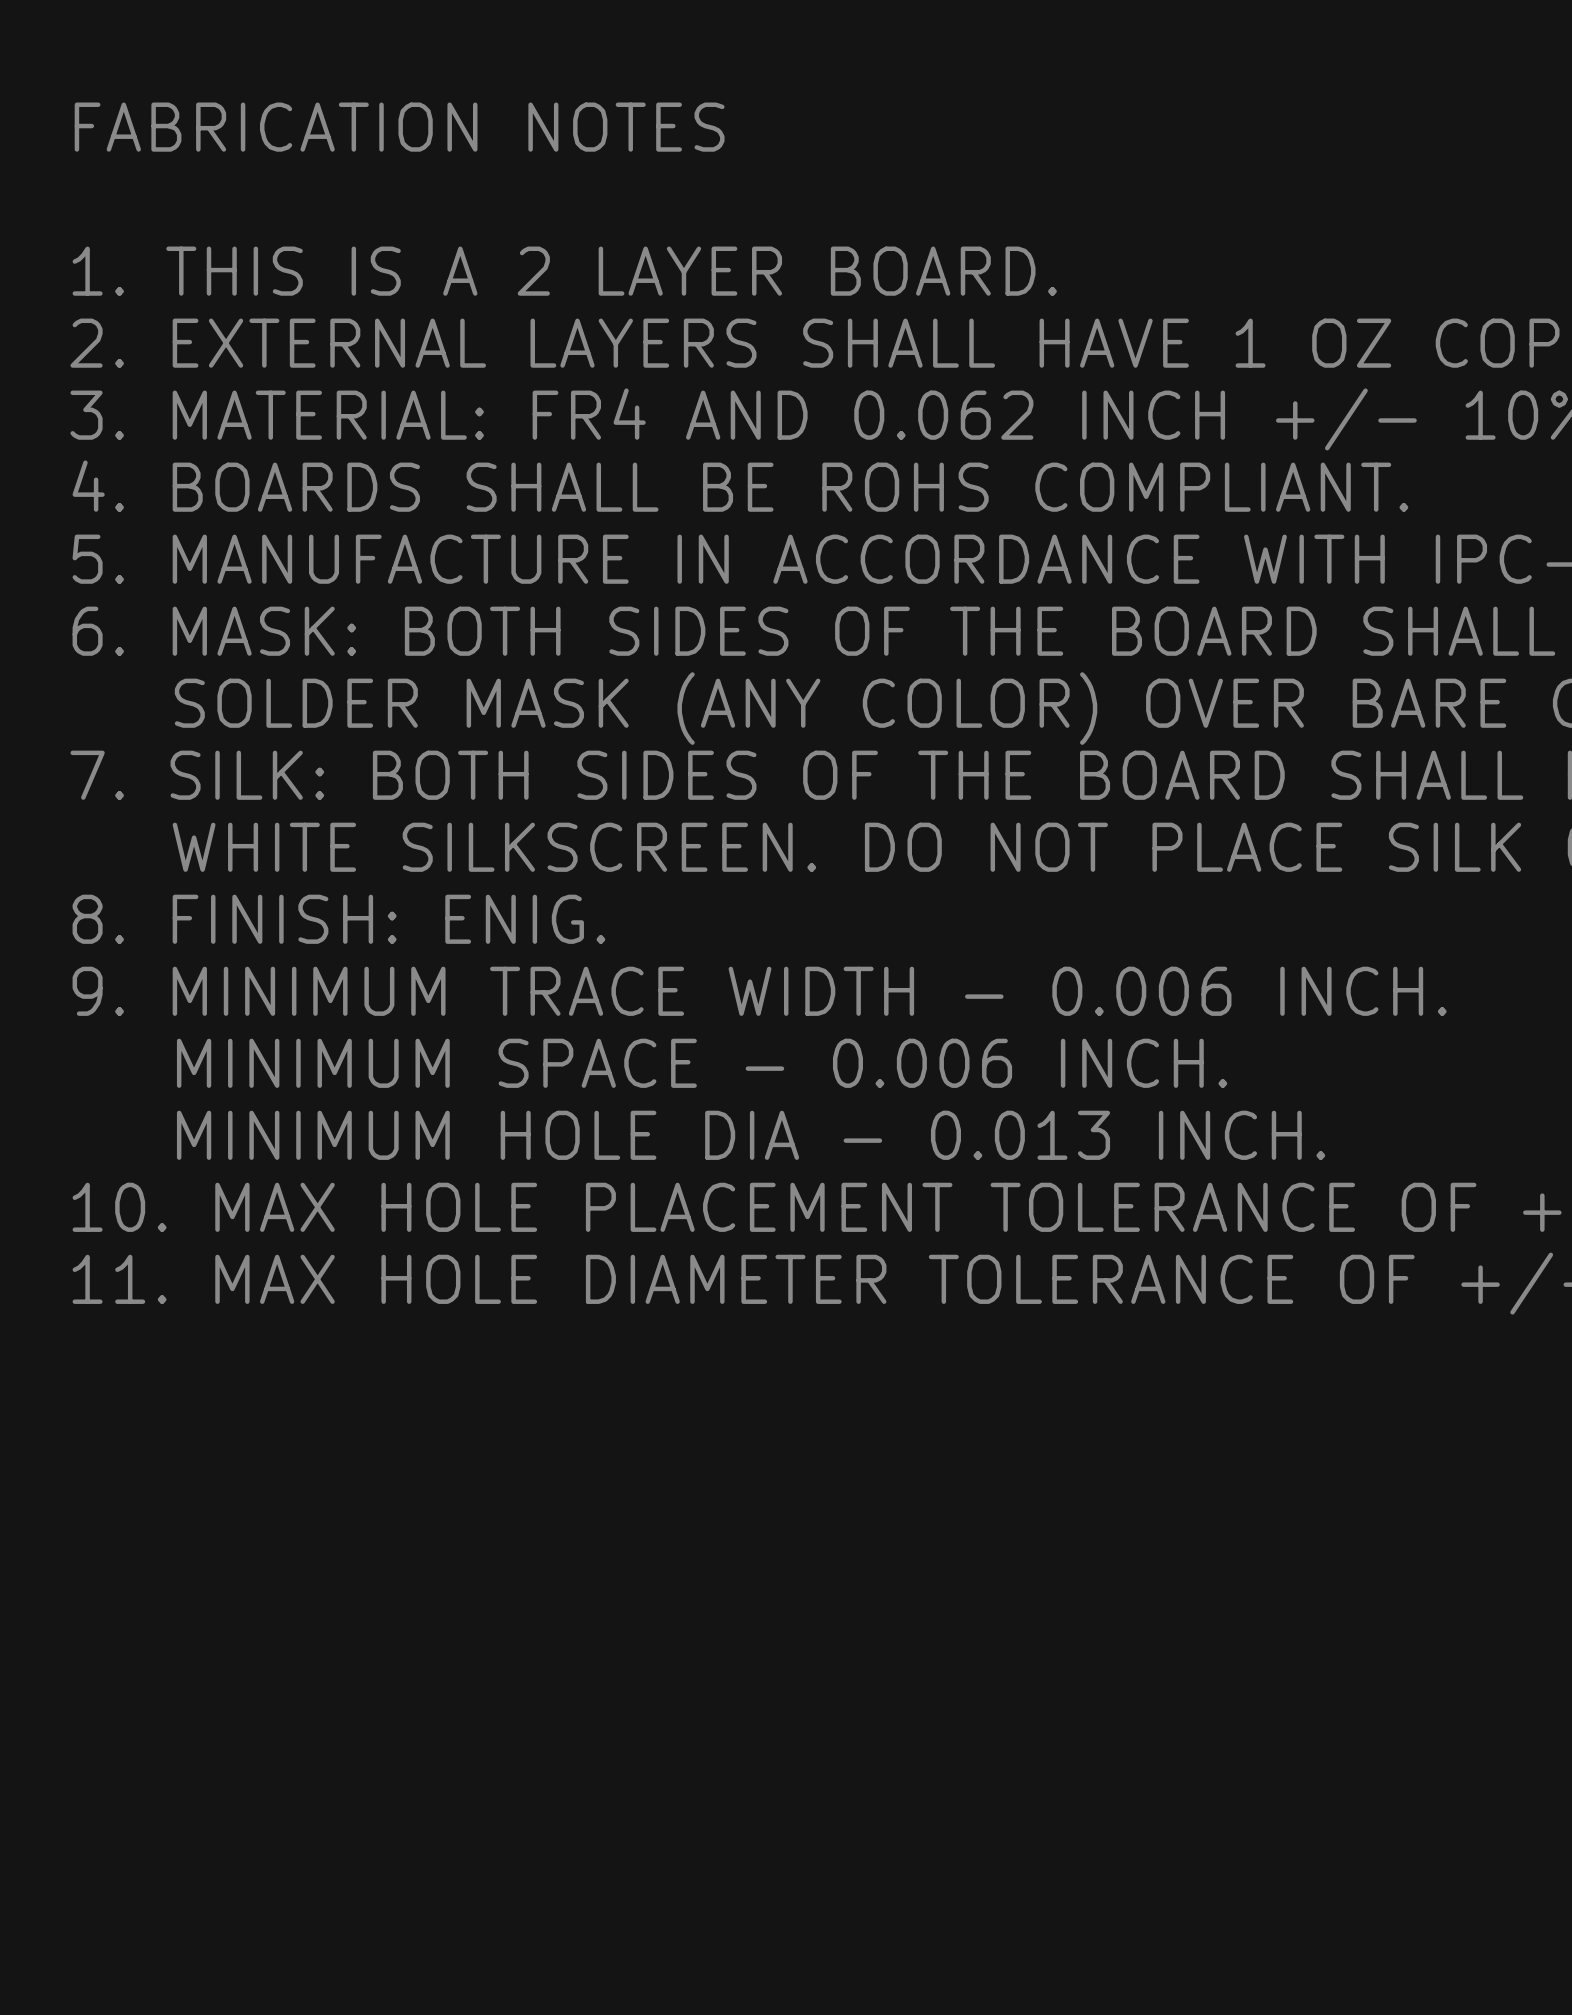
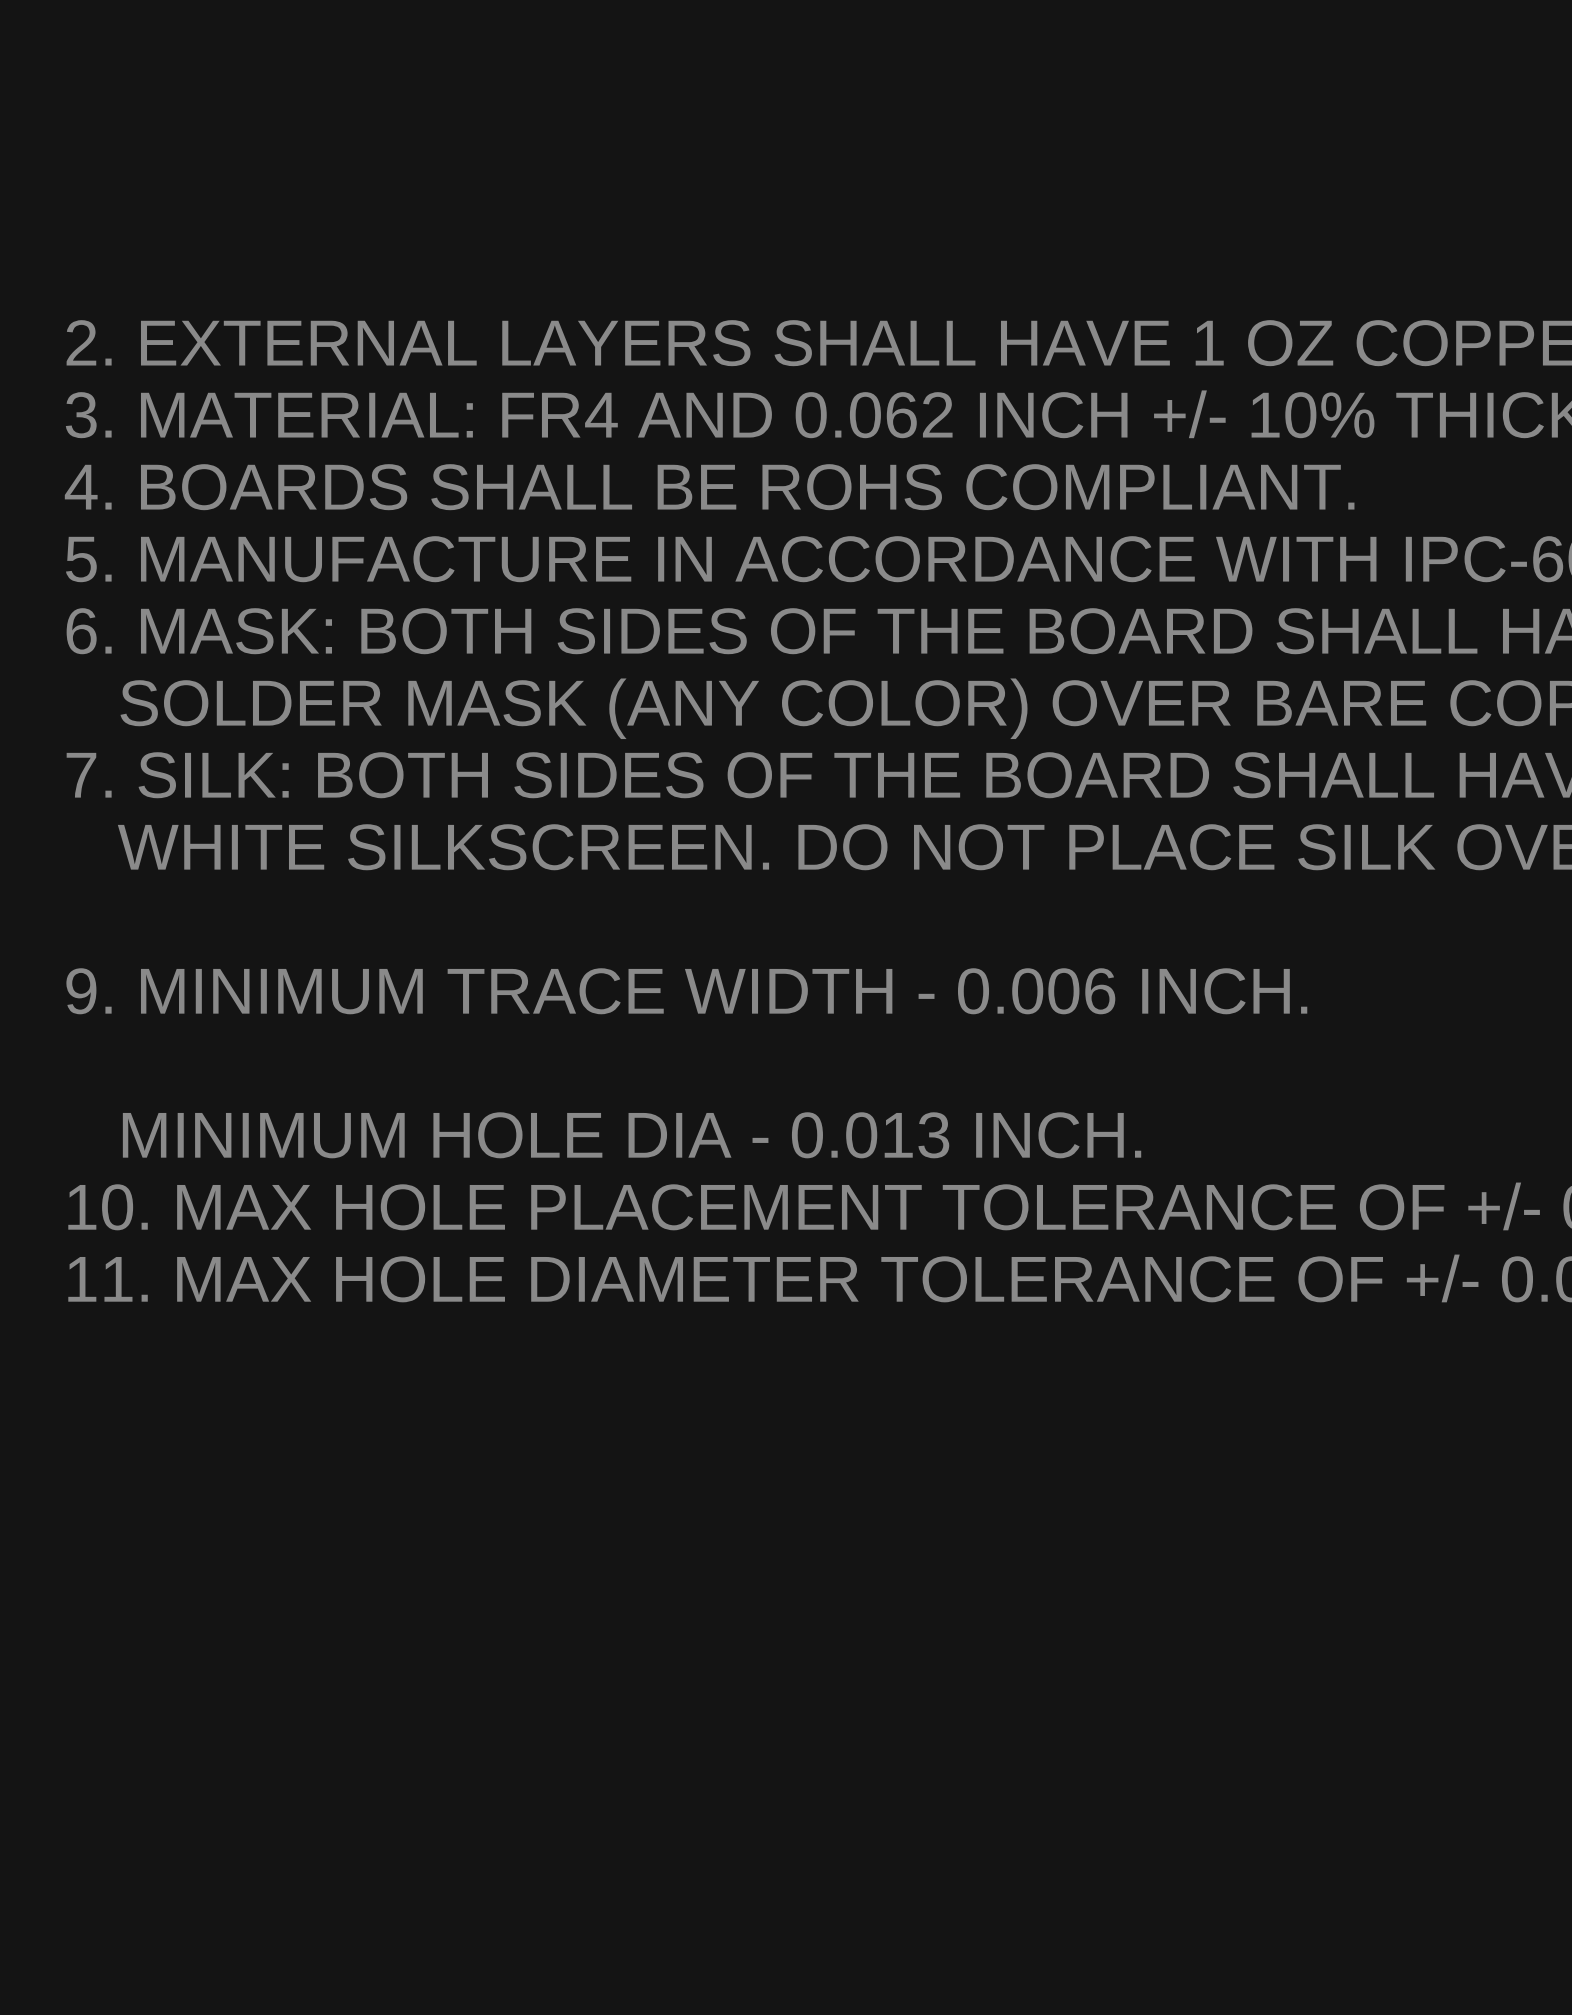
text: FABRICATION NOTES (399, 127) -> none
text: 1. THIS IS A 2 LAYER BOARD. (564, 271) -> none
text: 8. FINISH: ENIG. (338, 919) -> none
text: MINIMUM SPACE - 0.006 INCH. (702, 1063) -> none

